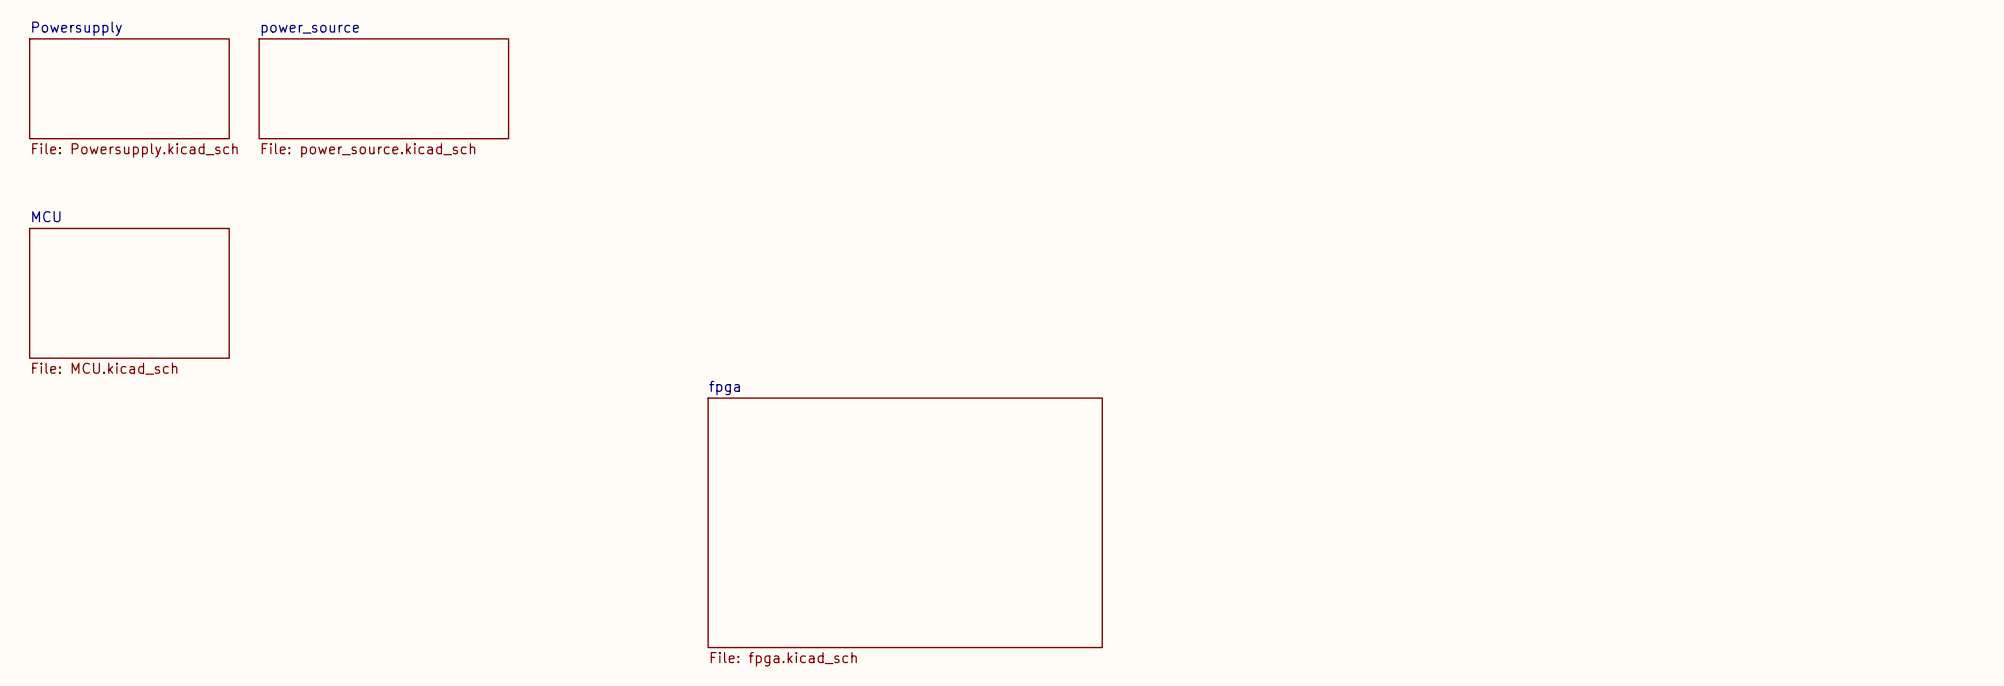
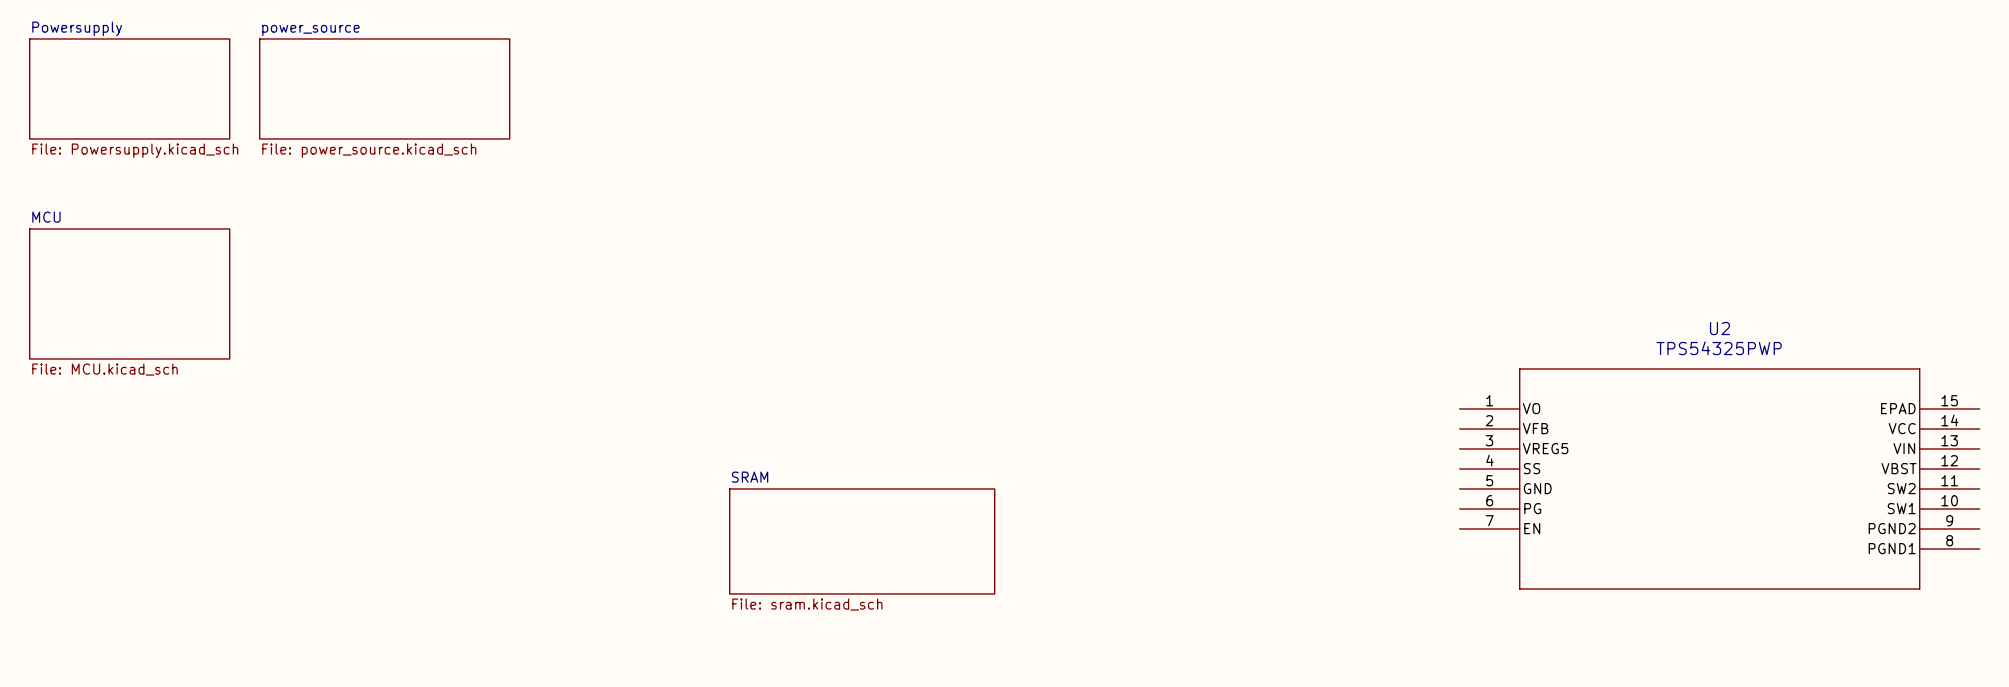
U2: none -> TPS54325PWP (1719, 478)
sheet fpga: File: fpga.kicad_sch (905, 522) -> none
sheet SRAM: none -> File: sram.kicad_sch (862, 541)

